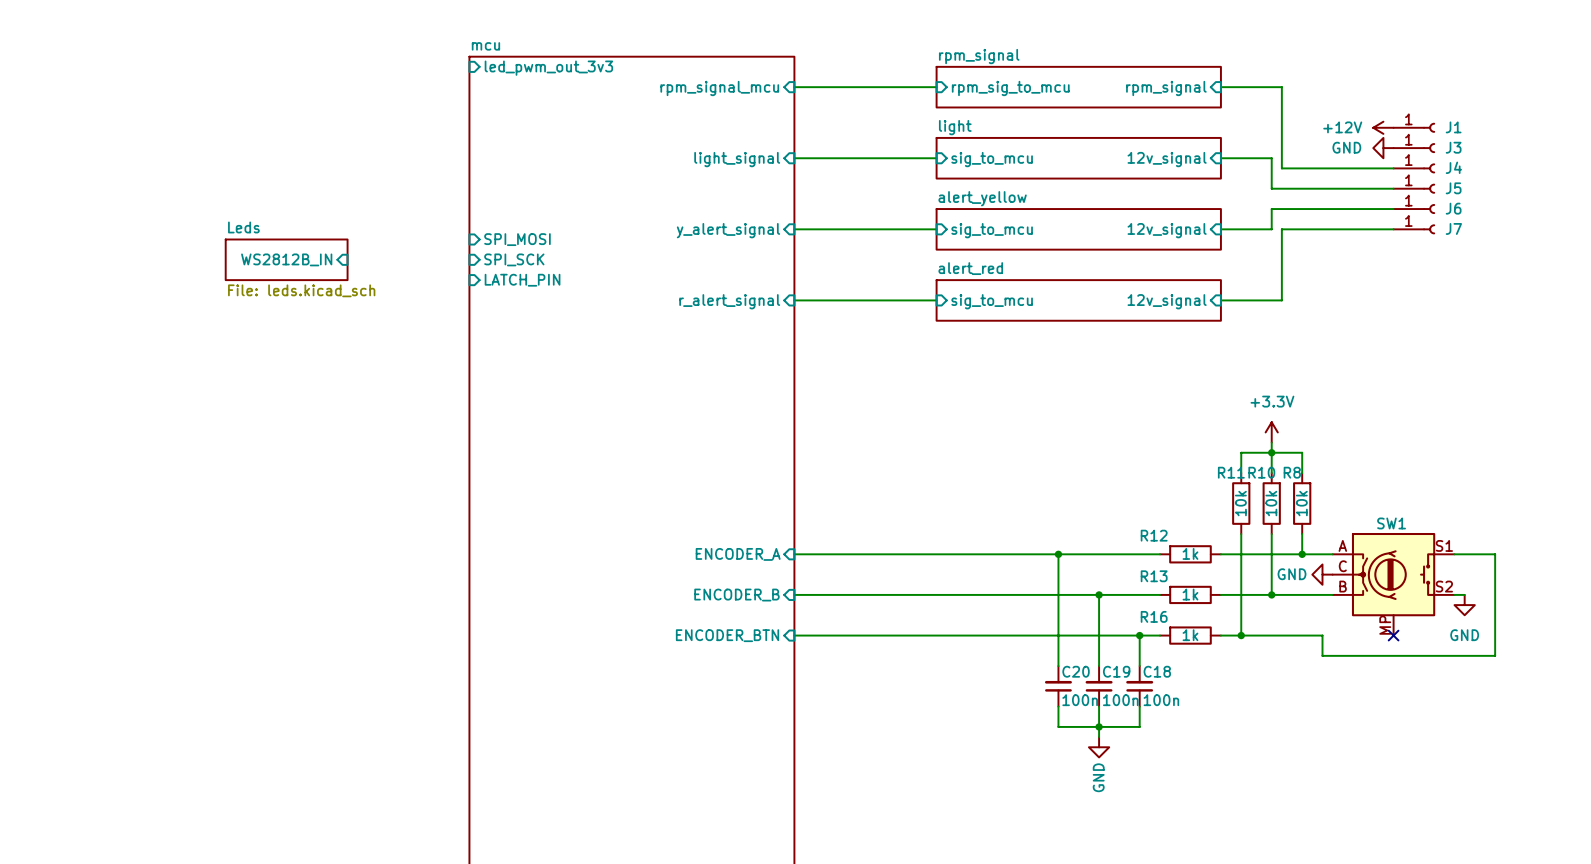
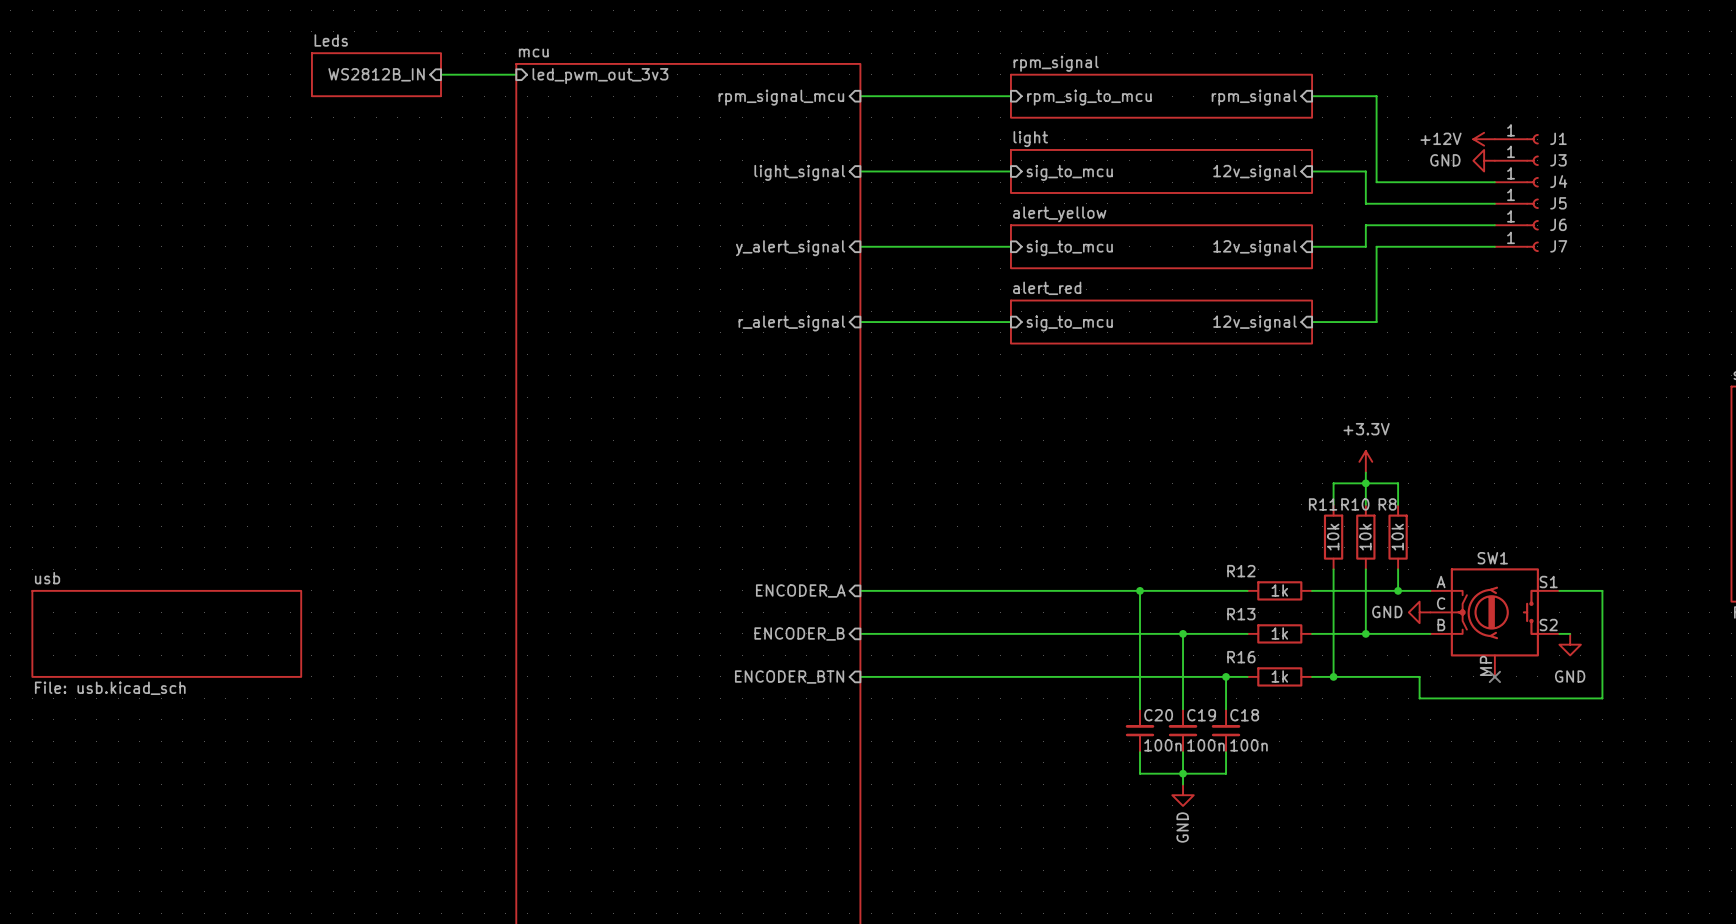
sheet Leds: none -> (376, 74)
wire: none -> (441, 74) (516, 74)
sheet pin: SPI_MOSI (517, 239) -> none
sheet pin position: WS2812B_IN (286, 259) -> WS2812B_IN (376, 74)
sheet Leds: File: leds.kicad_sch (286, 259) -> none
sheet pin: SPI_SCK (514, 259) -> none
sheet pin: LATCH_PIN (522, 280) -> none
sheet usb: none -> File: usb.kicad_sch (166, 633)

